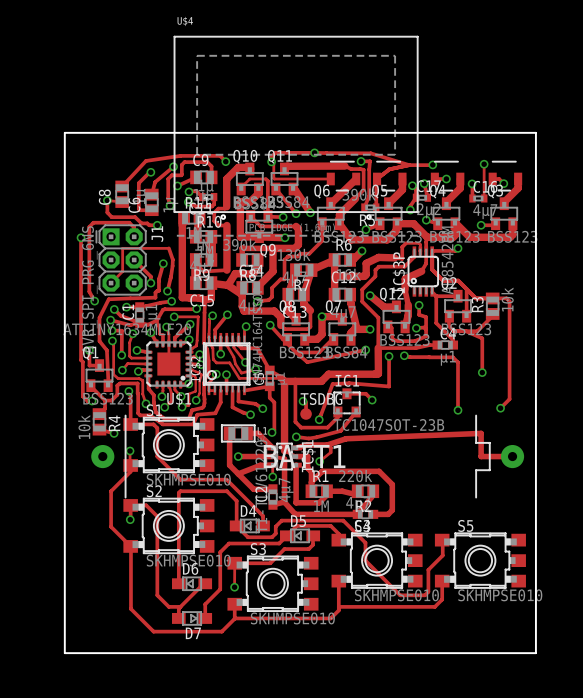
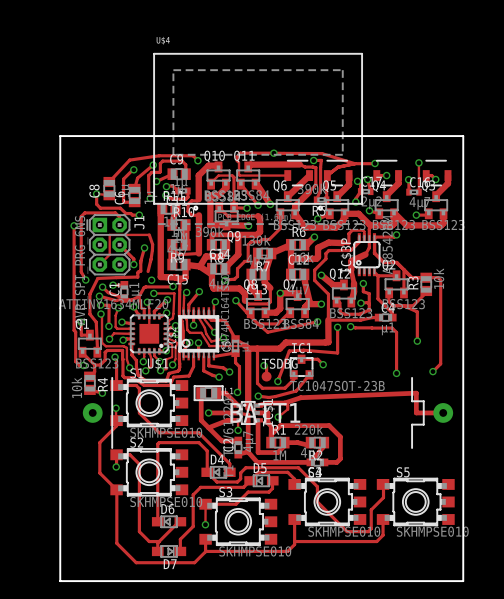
via: (271, 161) -> none
via: (167, 291) -> none
track: (171, 301) (139, 307) -> none

